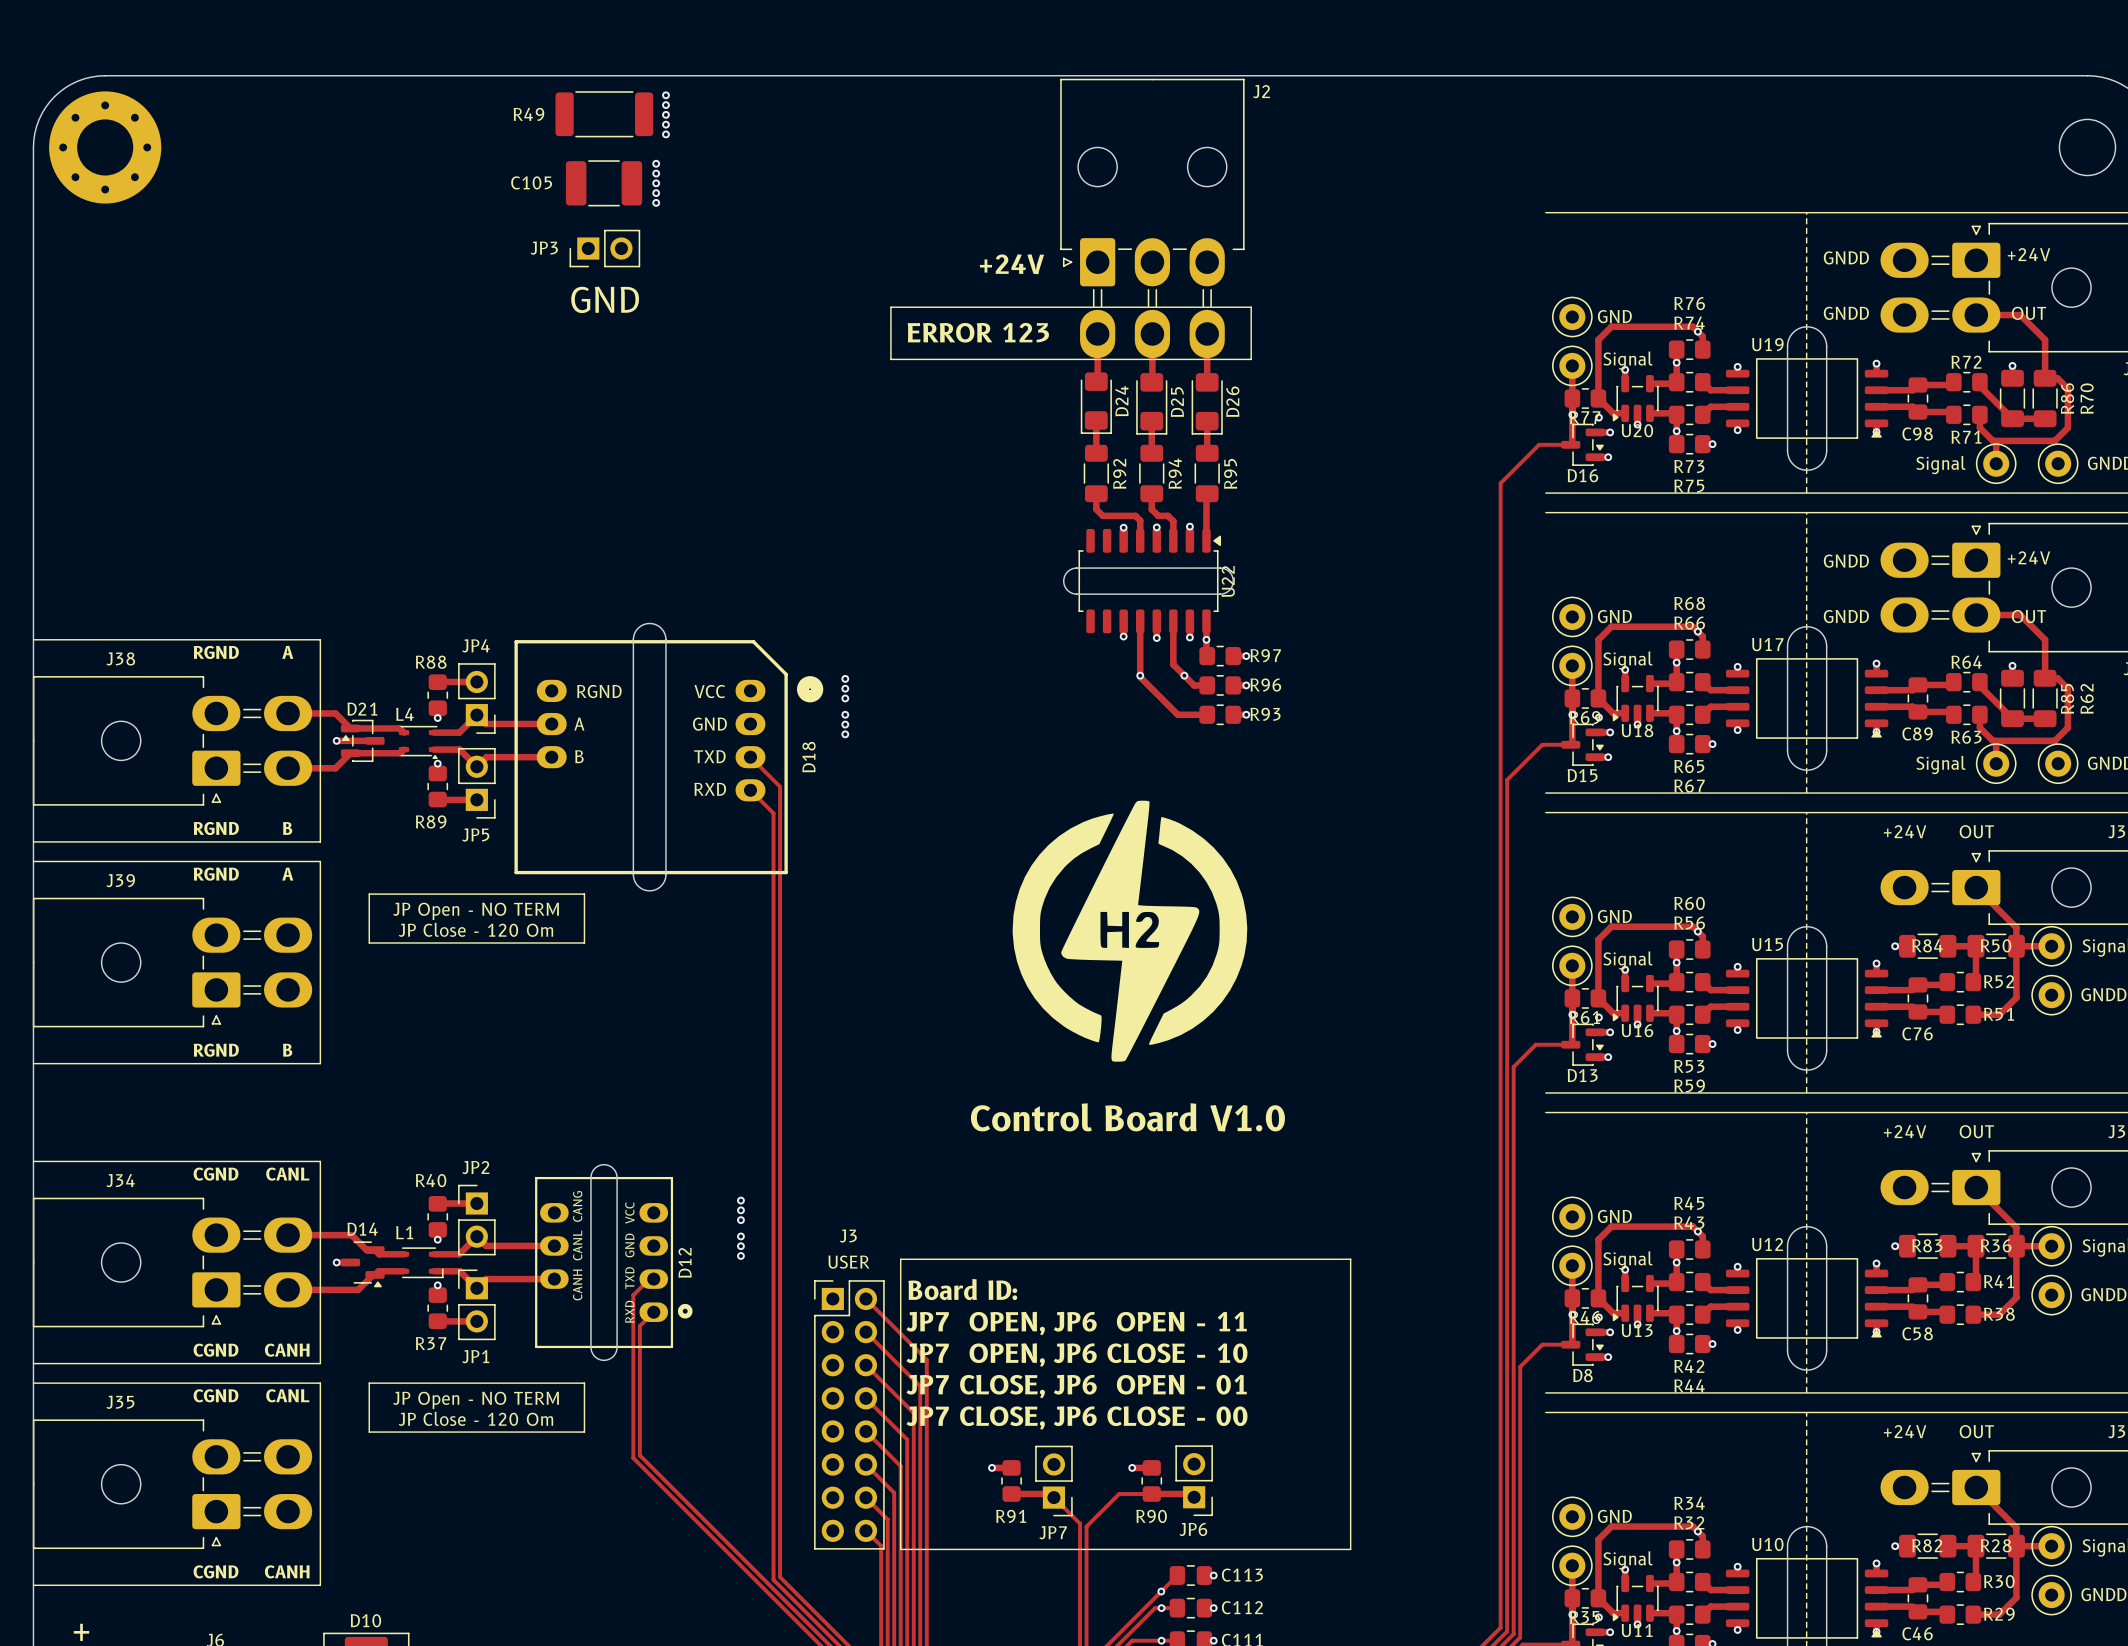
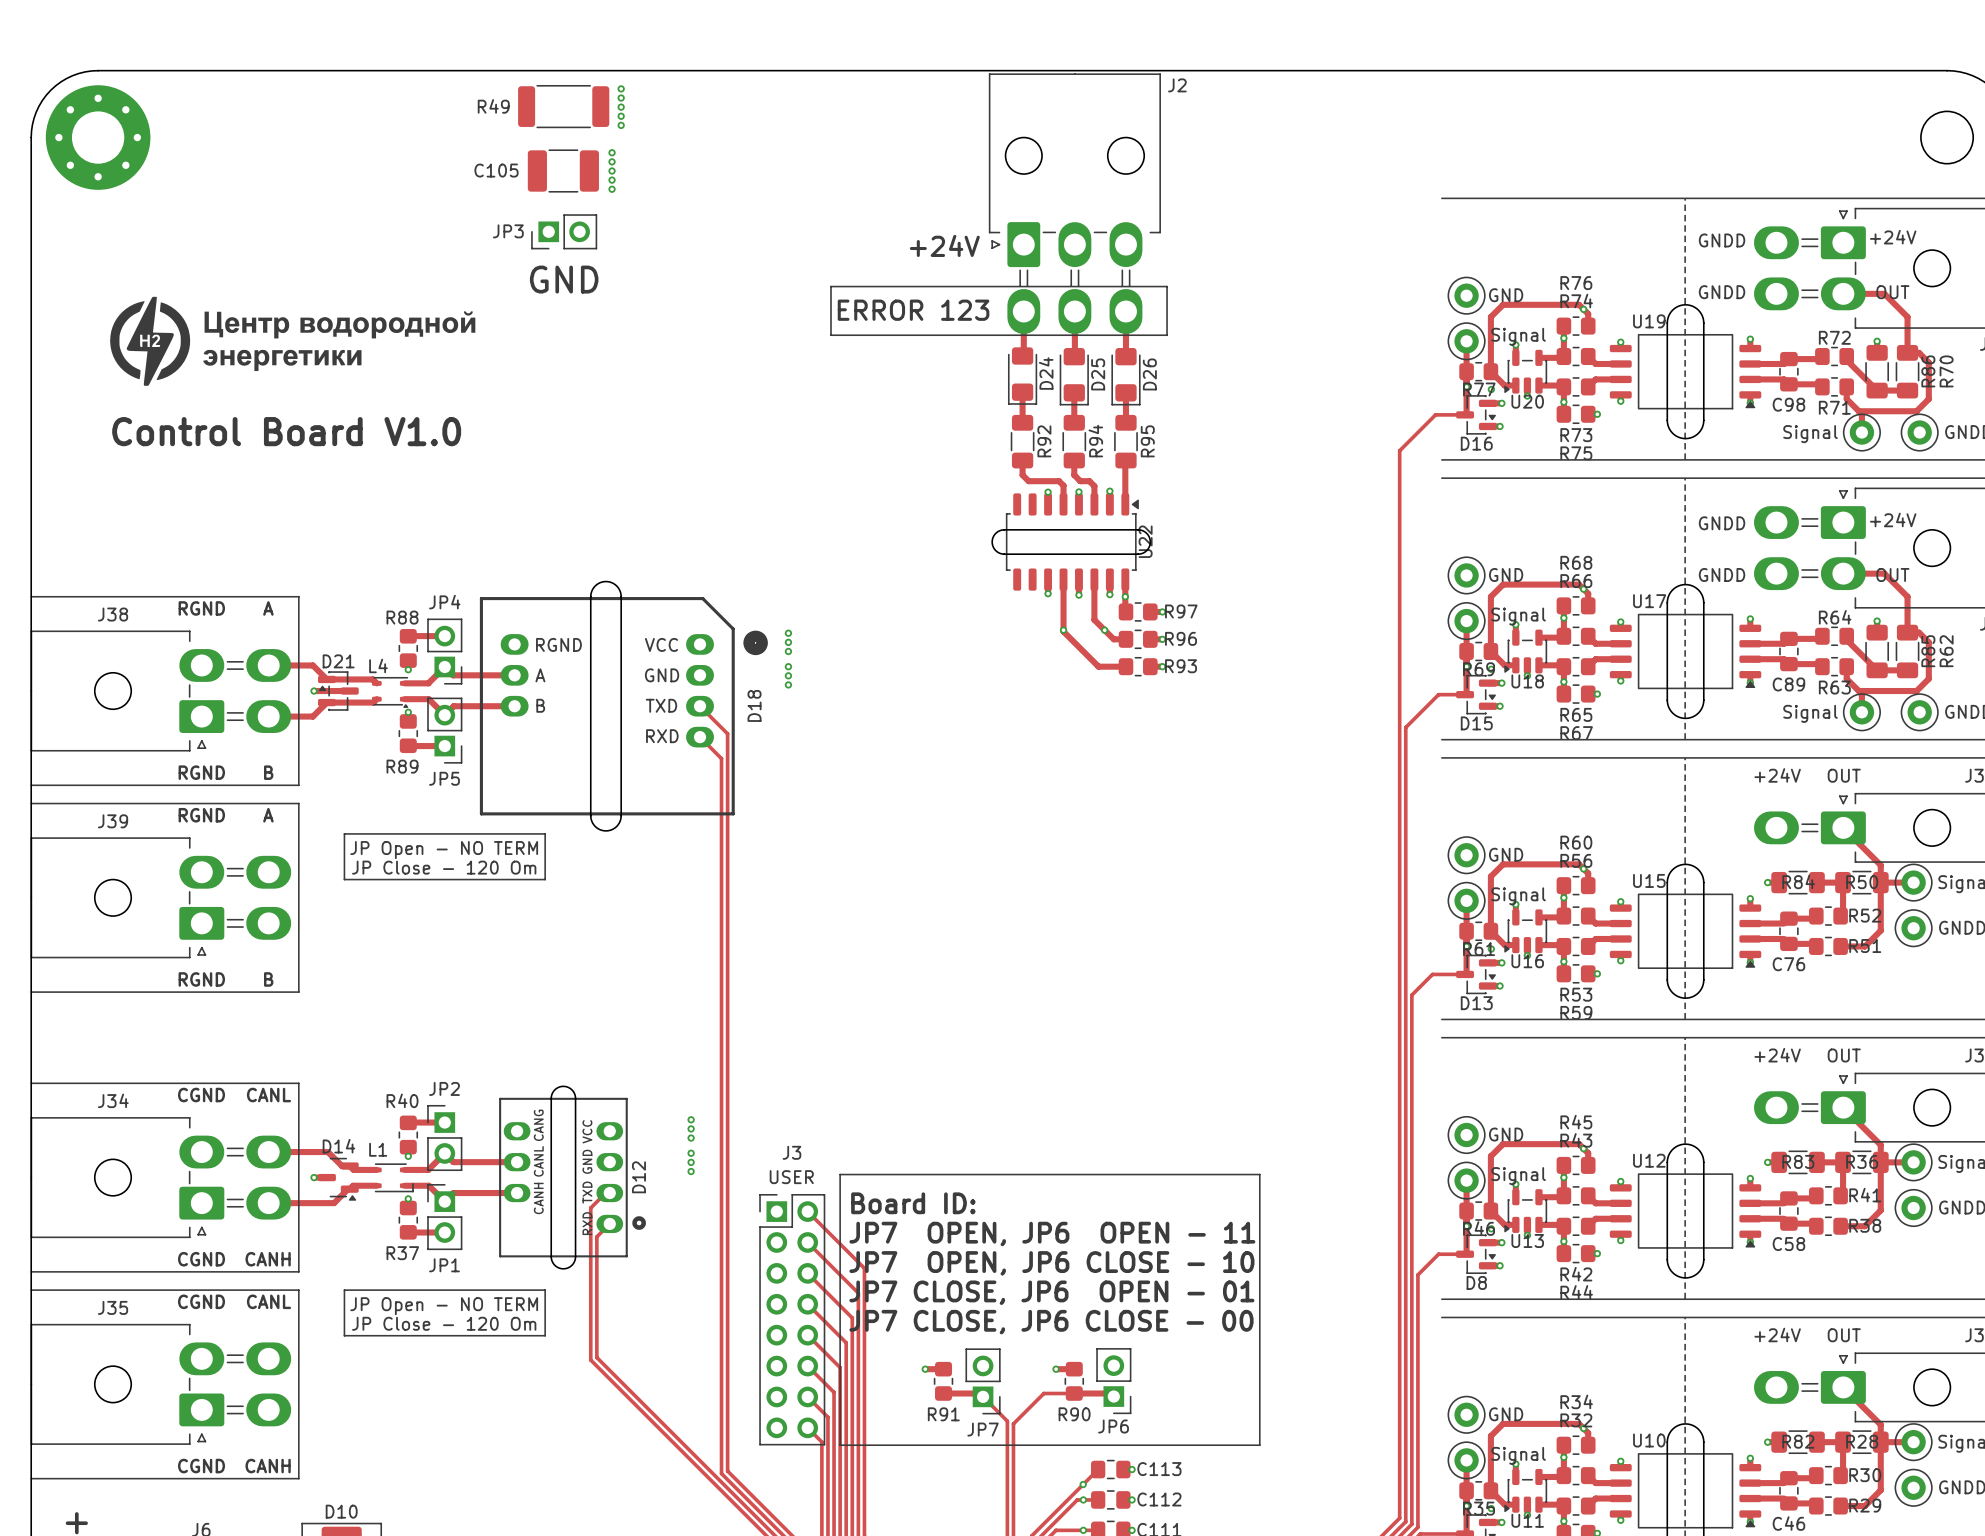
drawing: none -> [110, 296, 476, 386]
text: none -> Control Board V1.0 (286, 431)
drawing: [1012, 800, 1248, 1062] -> none
text: Control Board V1.0 (1127, 1117) -> none

